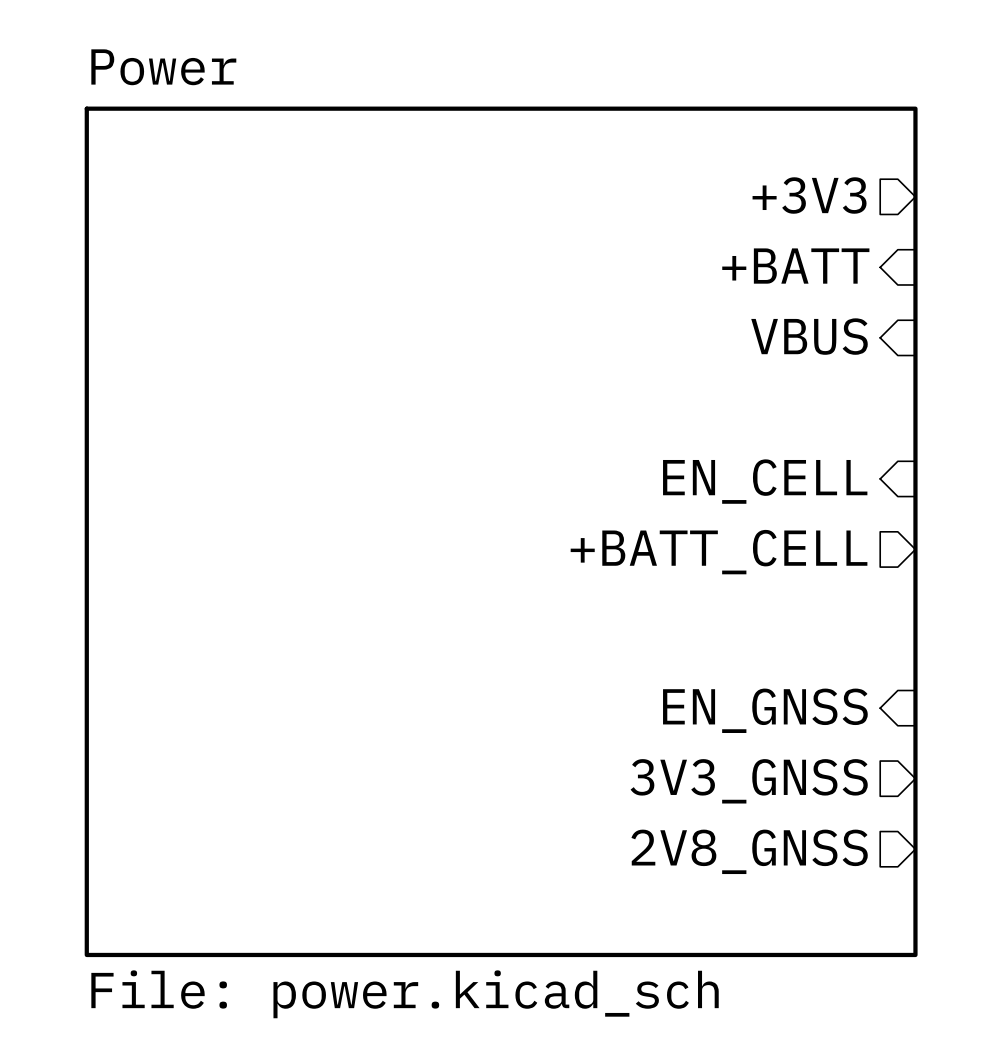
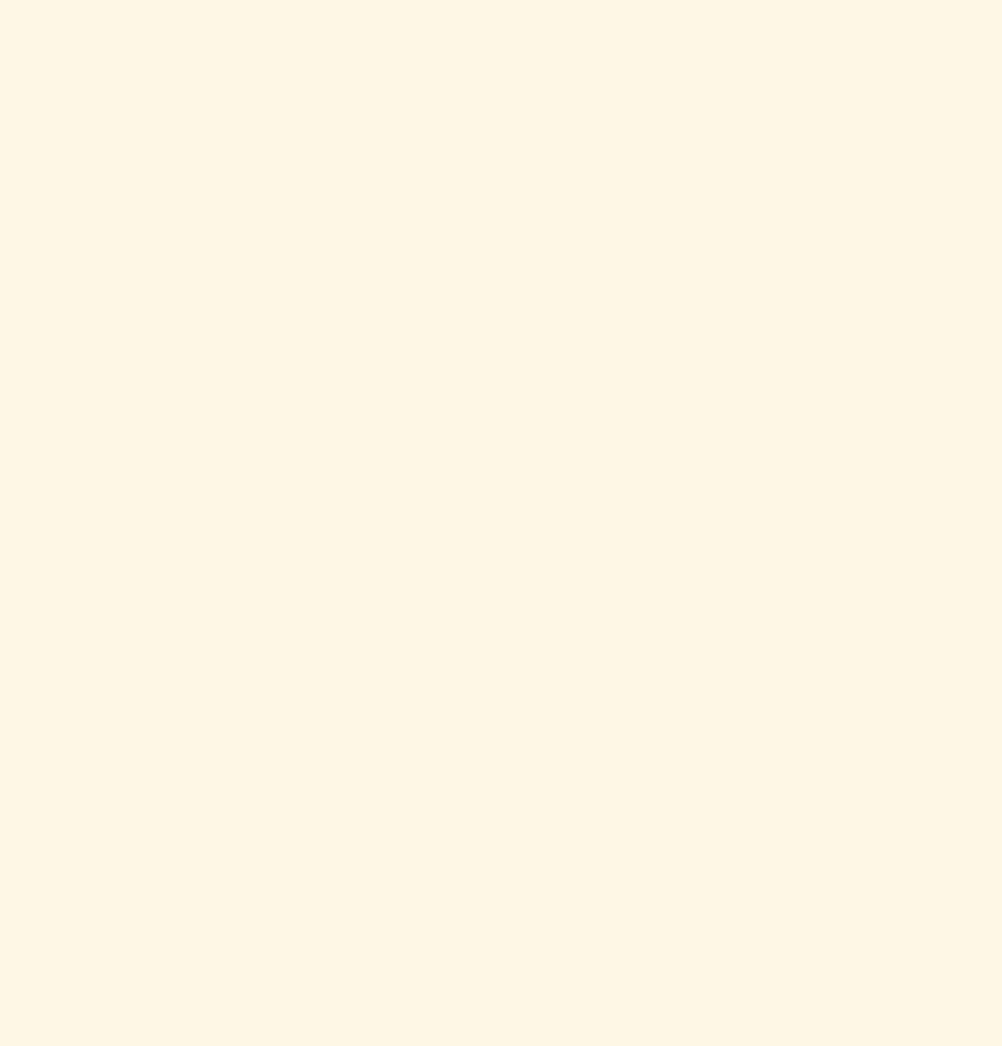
sheet pin: +3V3 (809, 195) -> none
sheet pin: +BATT (795, 266) -> none
sheet pin: VBUS (809, 336) -> none
sheet pin: EN_CELL (765, 481) -> none
sheet Power: File: power.kicad_sch (501, 531) -> none
sheet pin: +BATT_CELL (719, 552) -> none
sheet pin: EN_GNSS (765, 710) -> none
sheet pin: 3V3_GNSS (749, 781) -> none
sheet pin: 2V8_GNSS (749, 851) -> none

